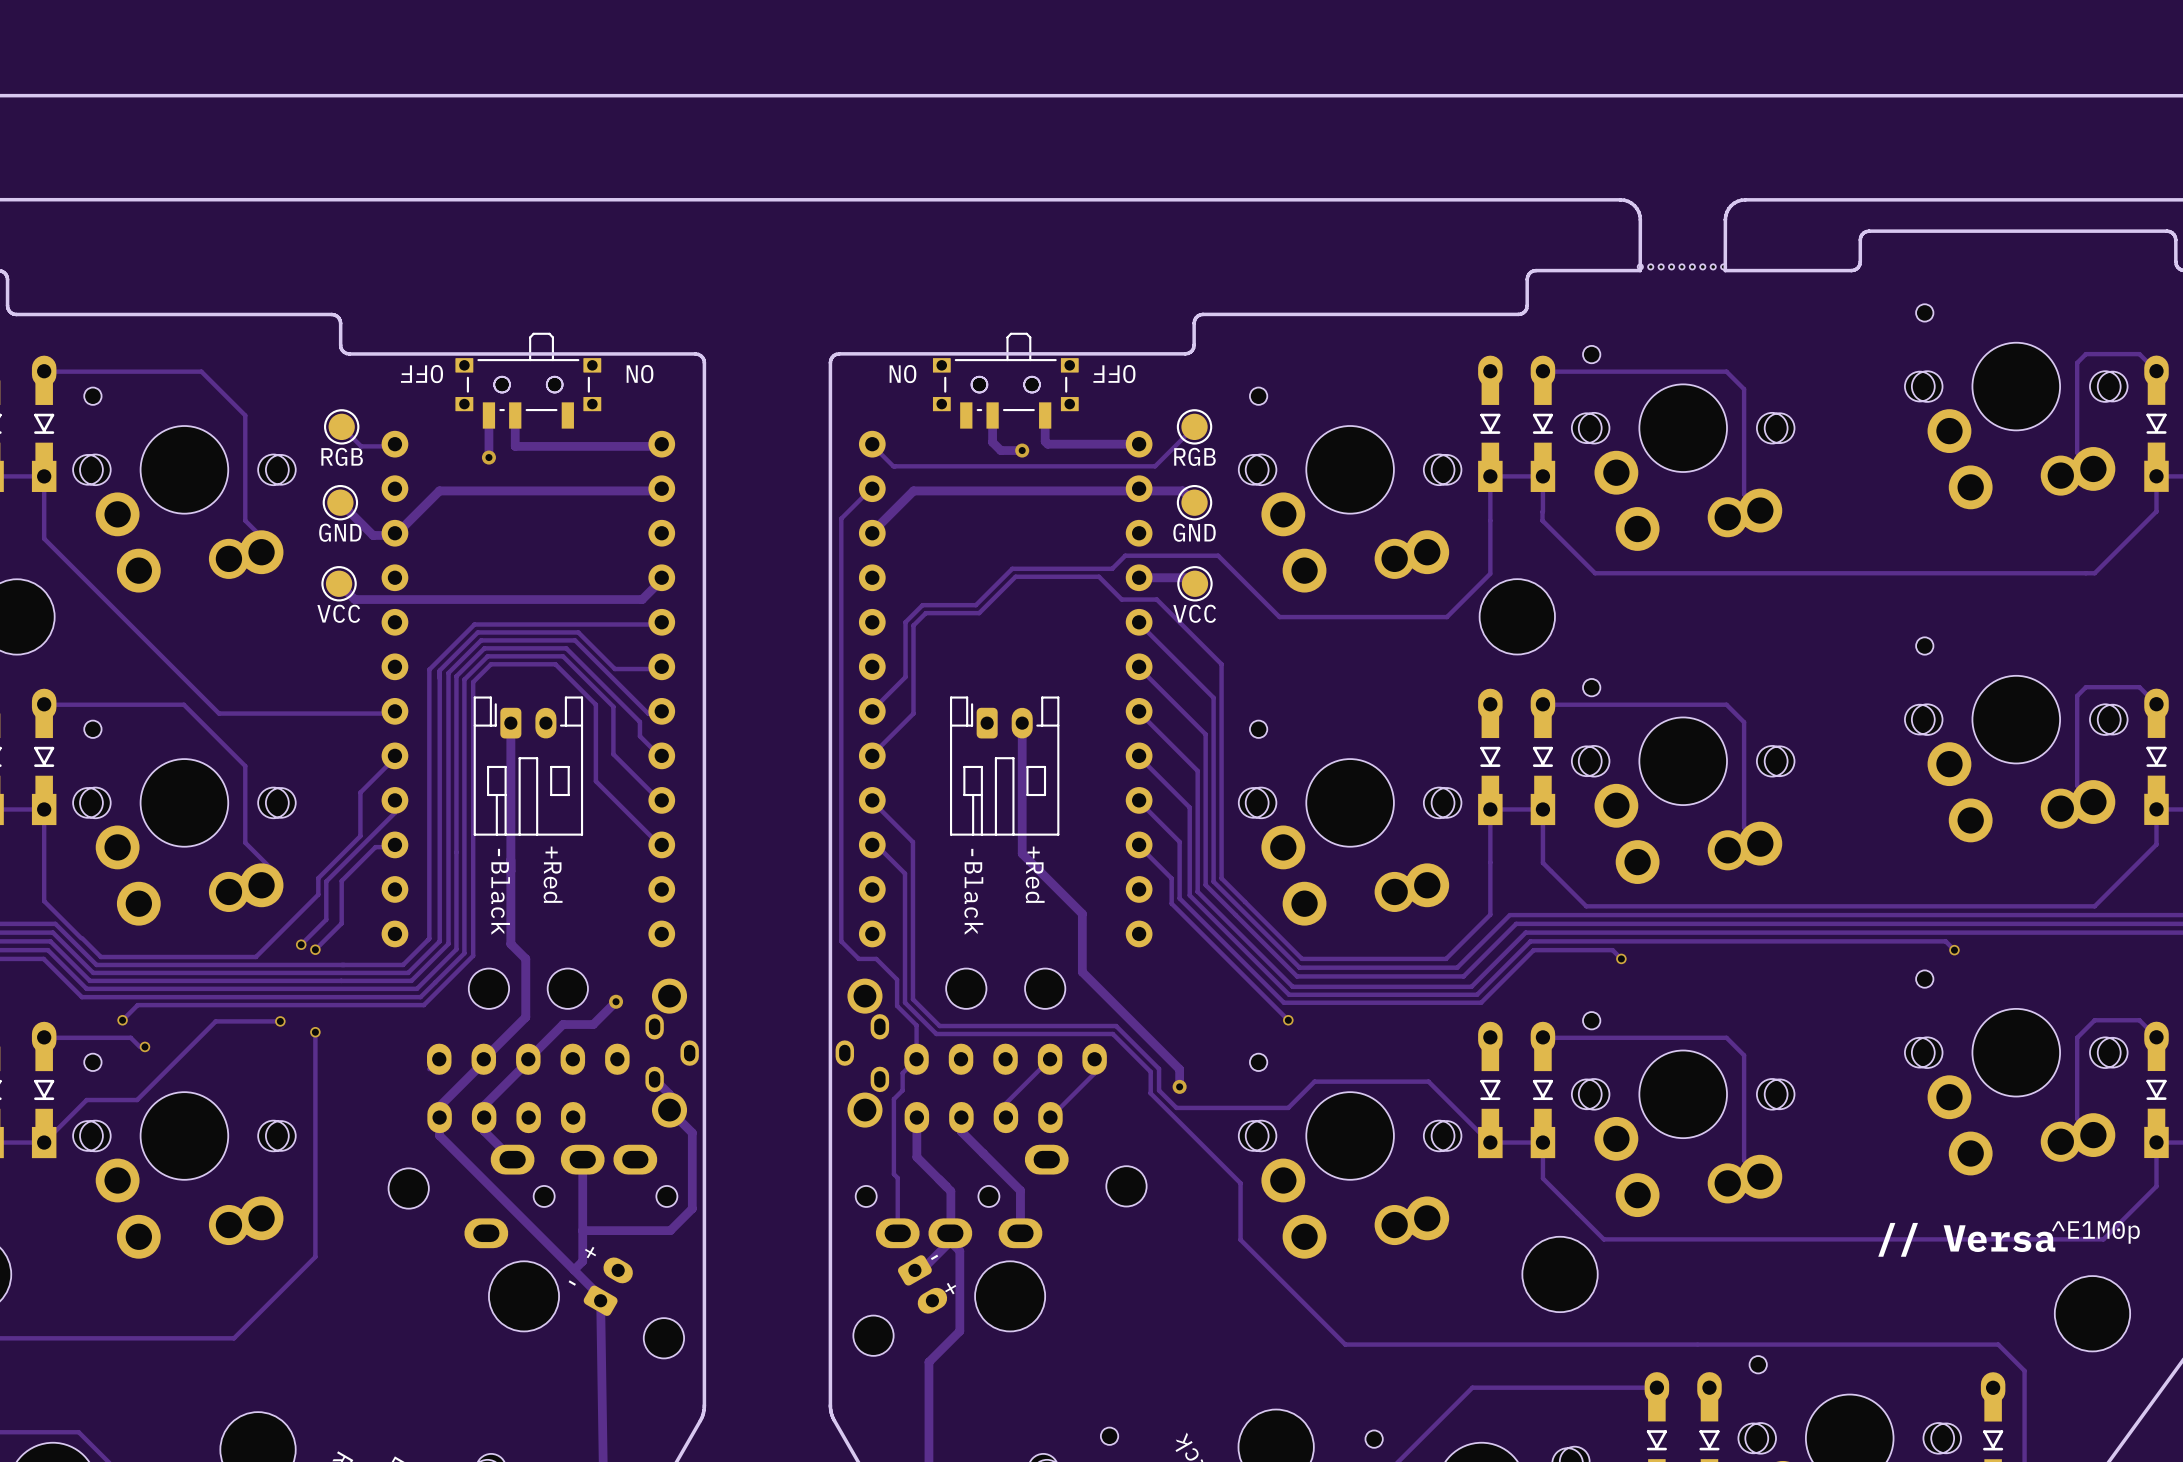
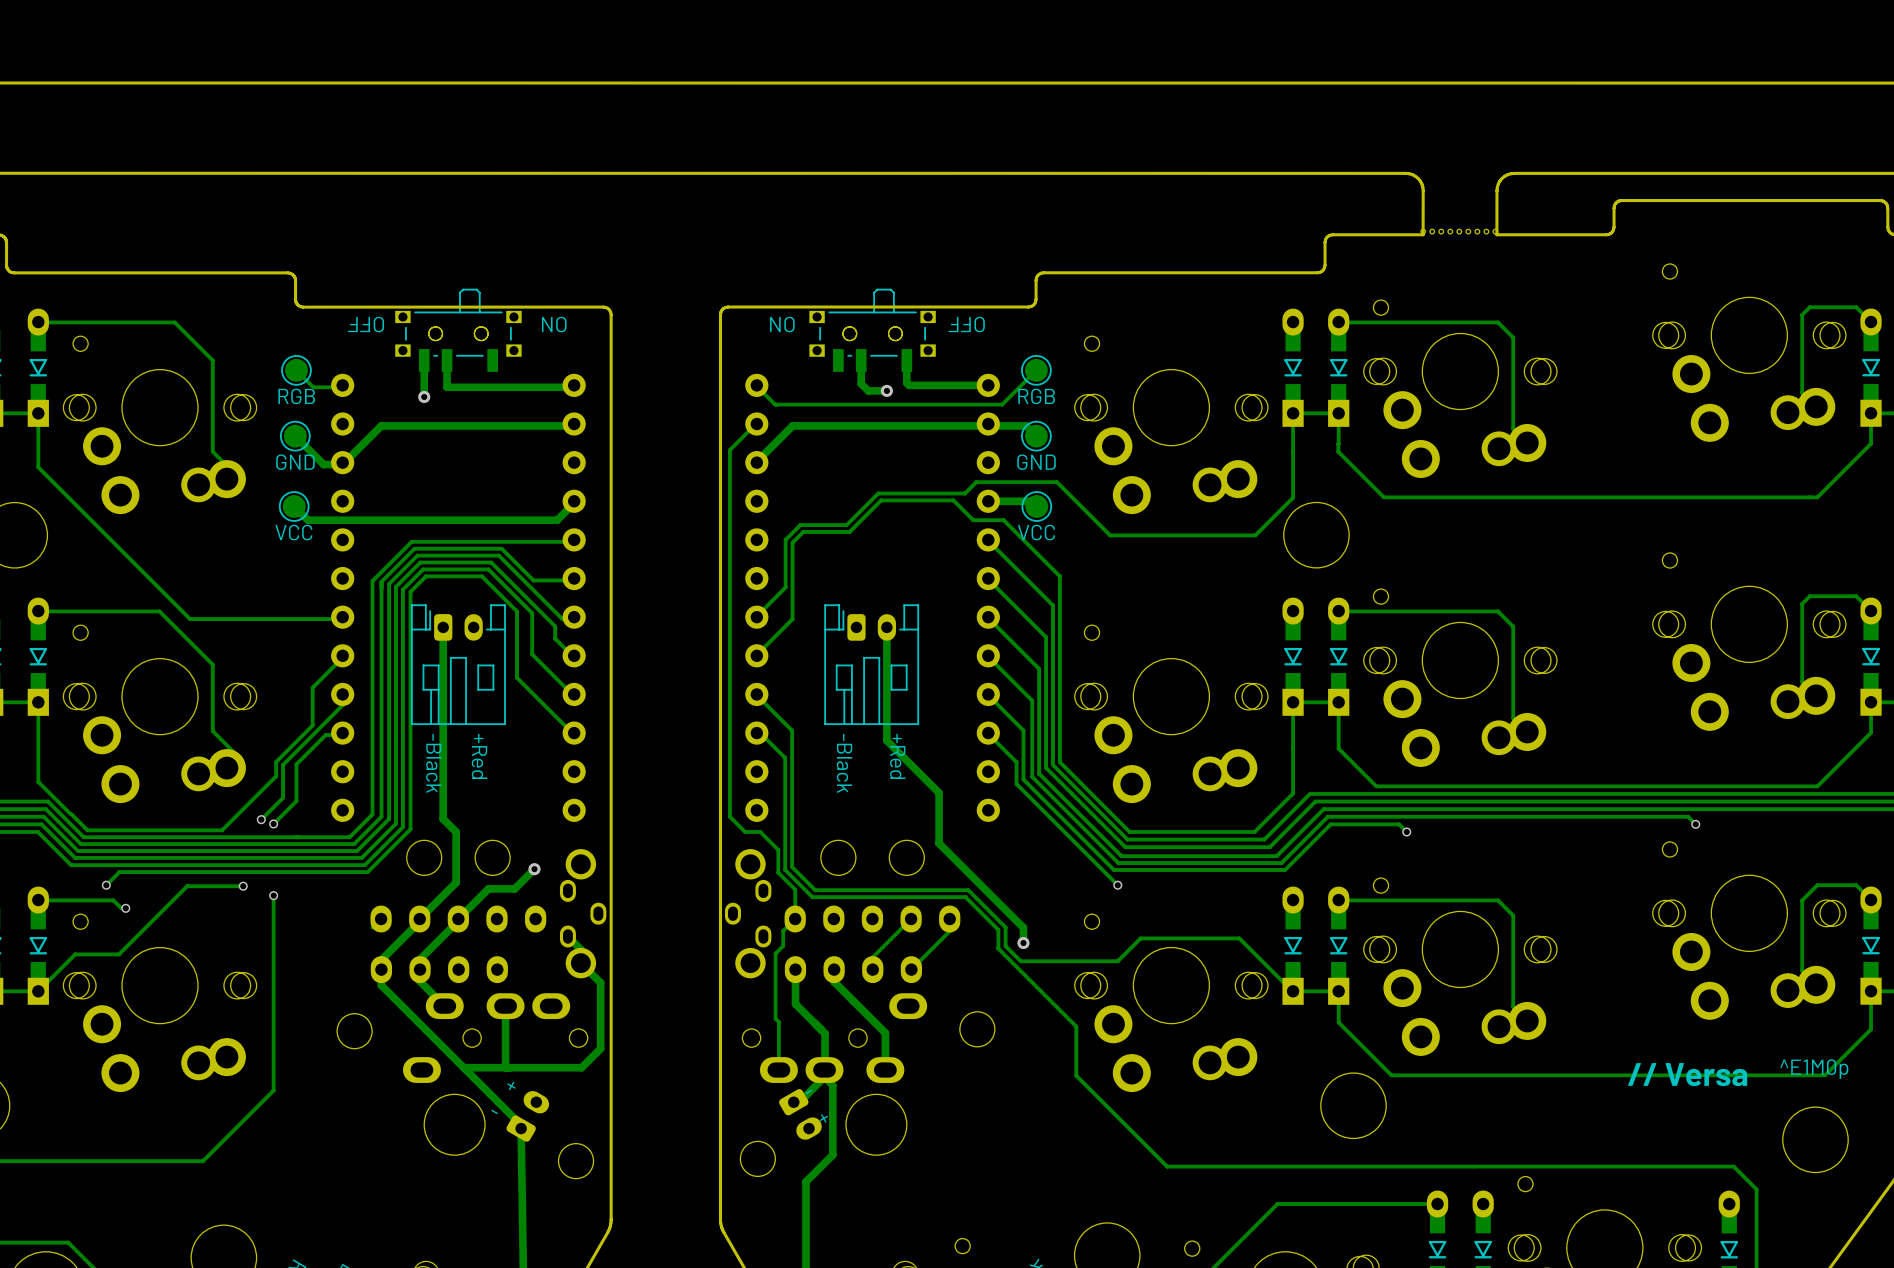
track: (582, 1230) (582, 1261) (573, 1270) -> (505, 1067) (463, 1067)

